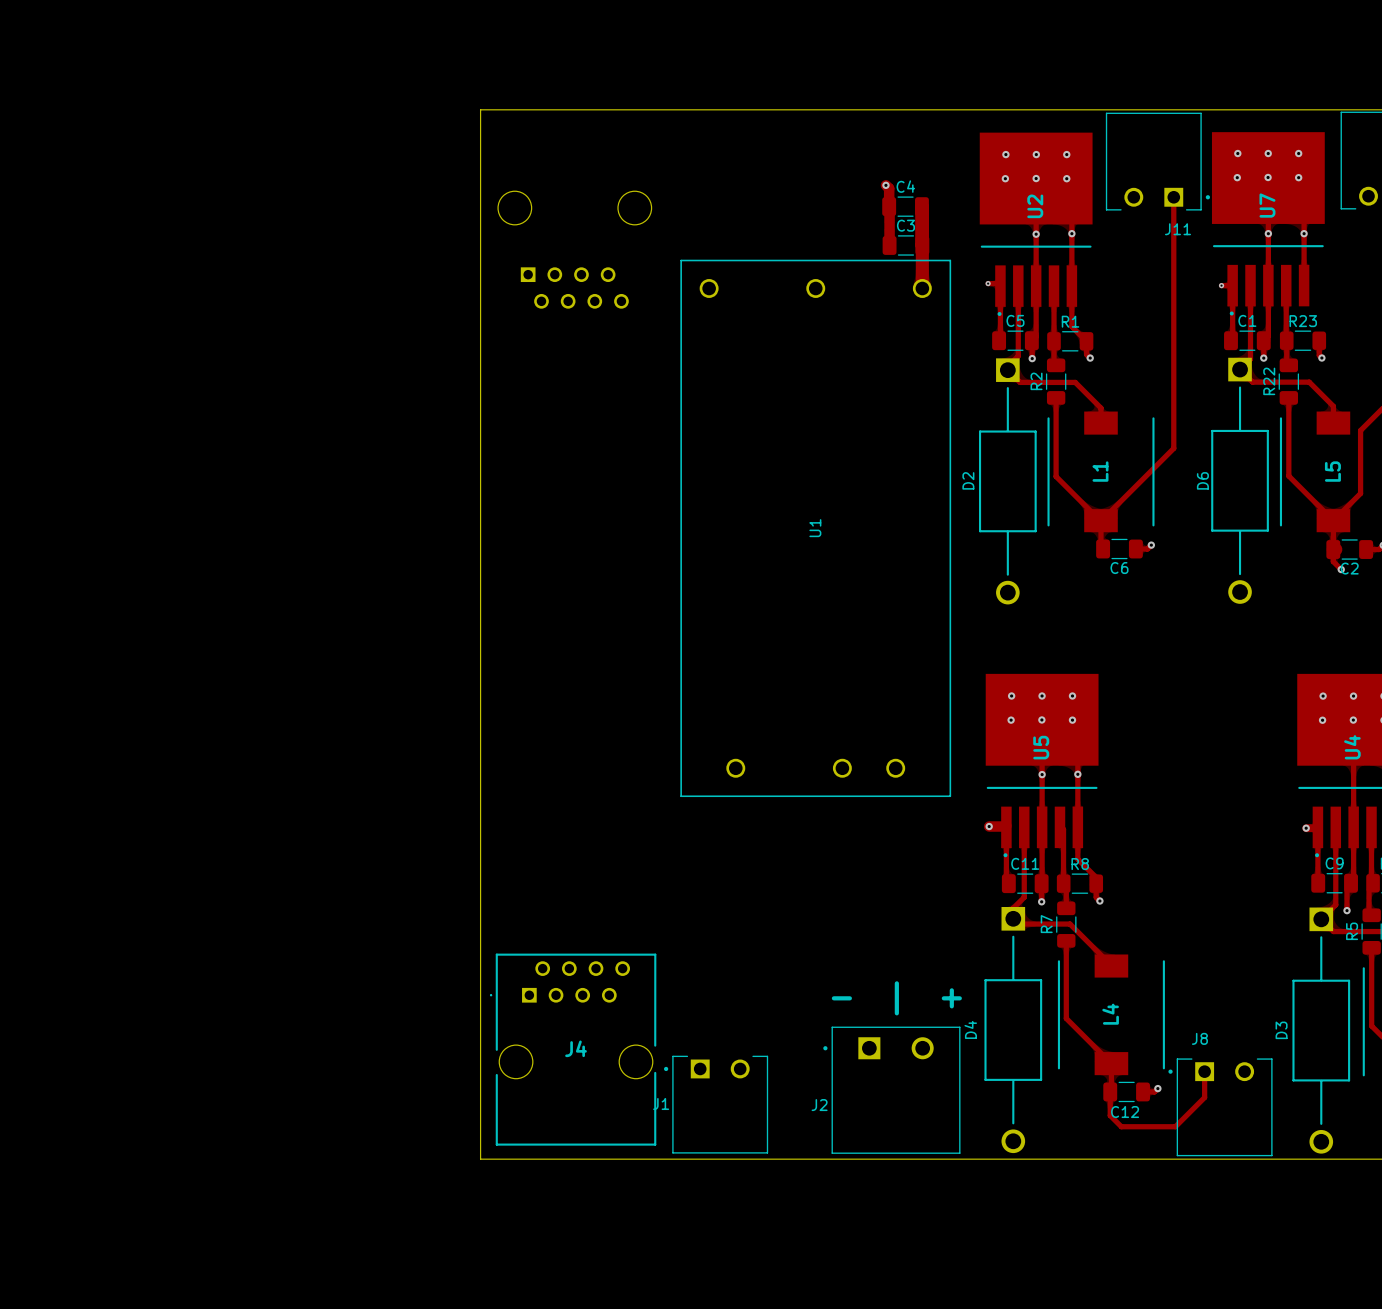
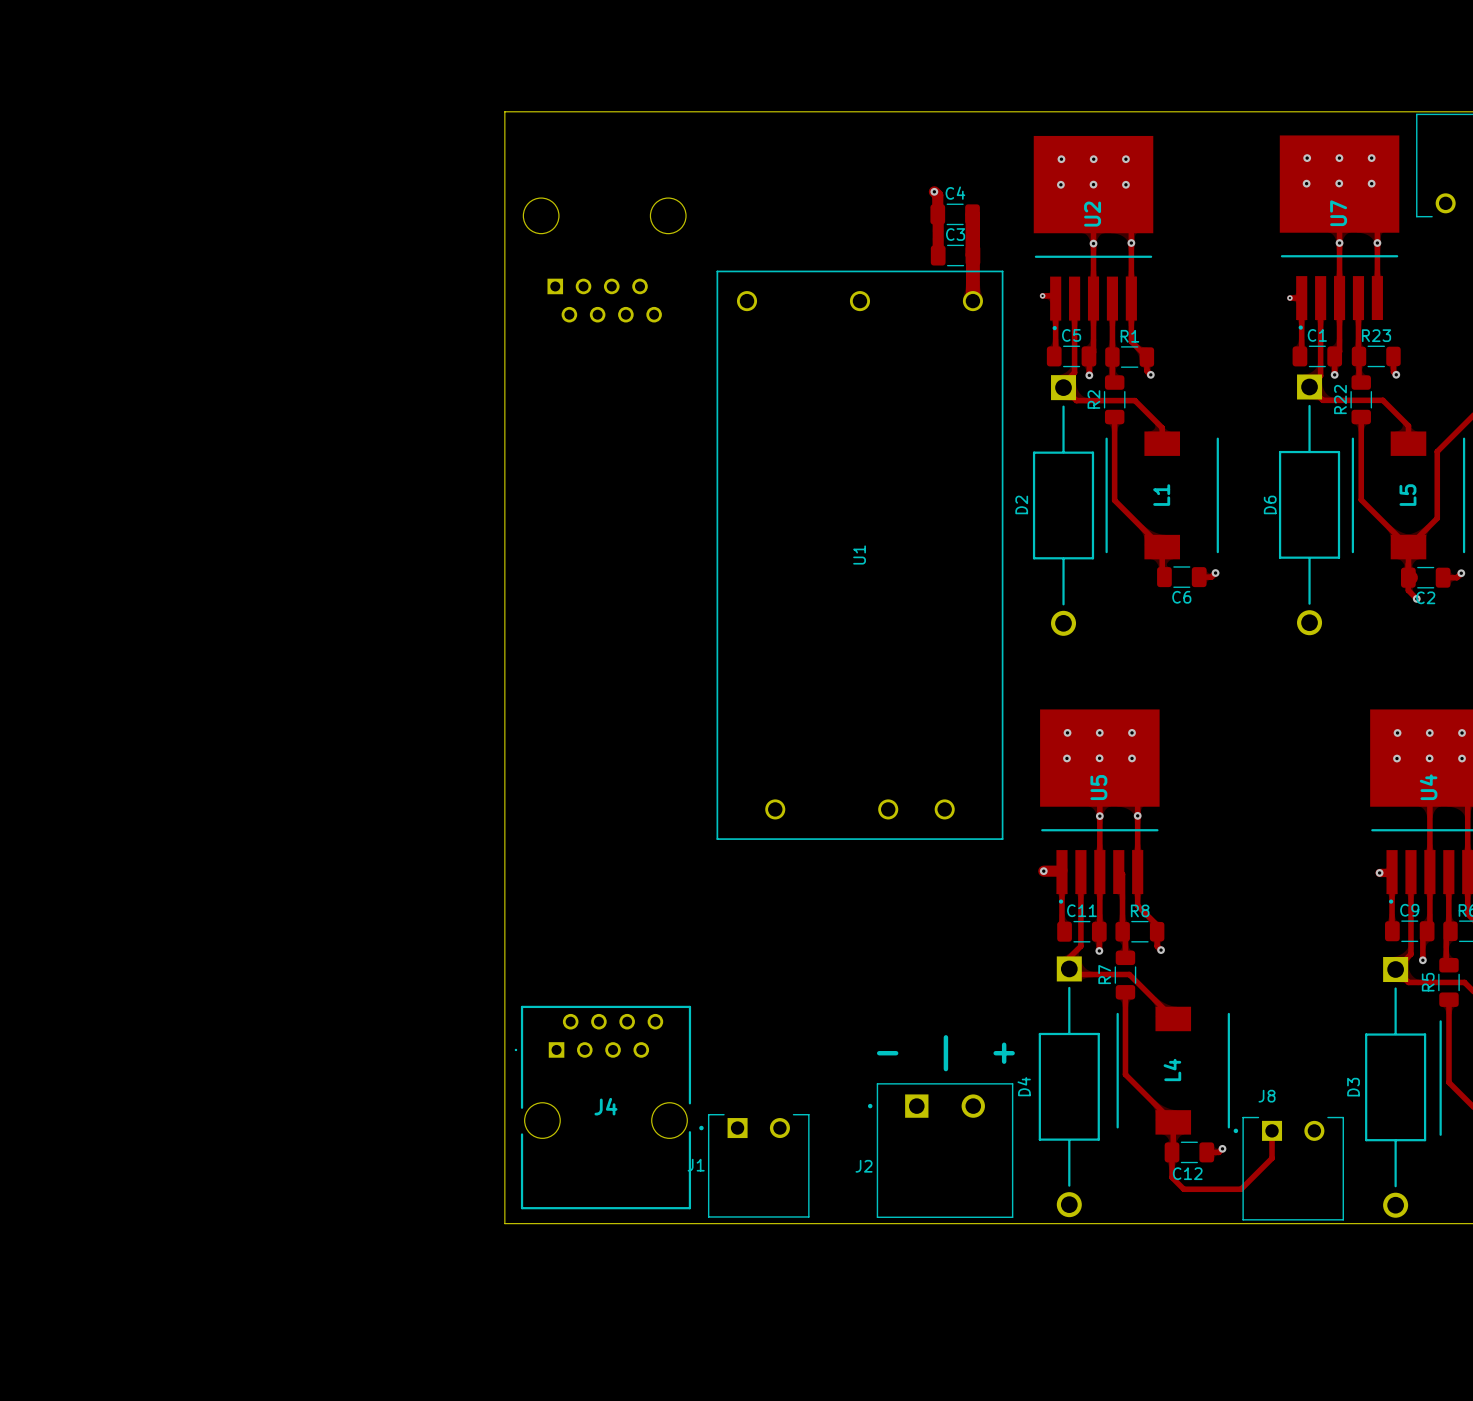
J11: (1157, 161) -> none
track: (1173, 197) (1173, 448) (1101, 520) -> none

